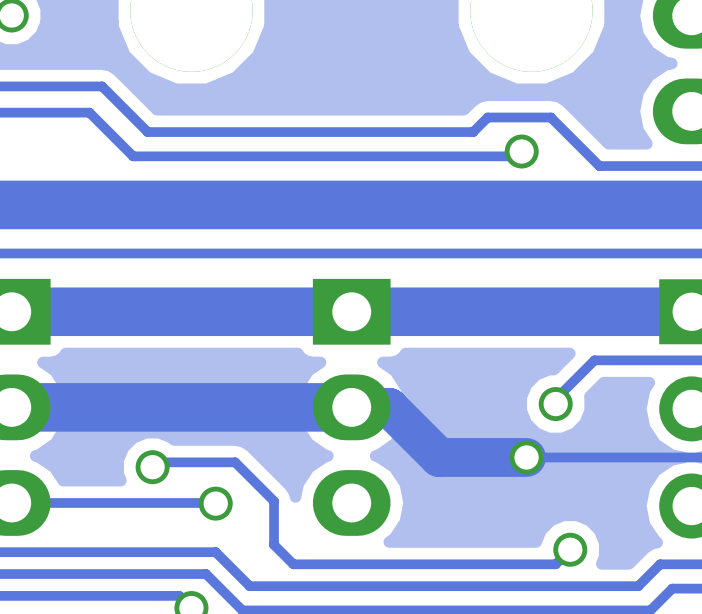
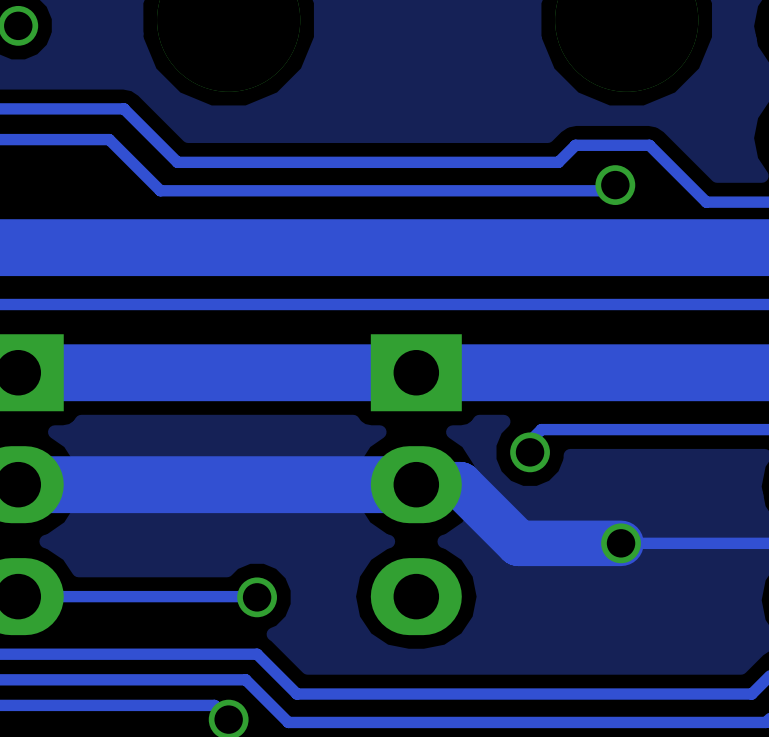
track: (594, 360) (555, 399) (555, 404) -> (700, 429) (541, 429) (530, 440) (530, 452)
via: none -> (530, 452)
via: (555, 404) -> none
track: (152, 467) (157, 462) (235, 462) (274, 501) (274, 544) (293, 564) (555, 564) (570, 549) -> none
via: (152, 467) -> none
via: (570, 549) -> none

